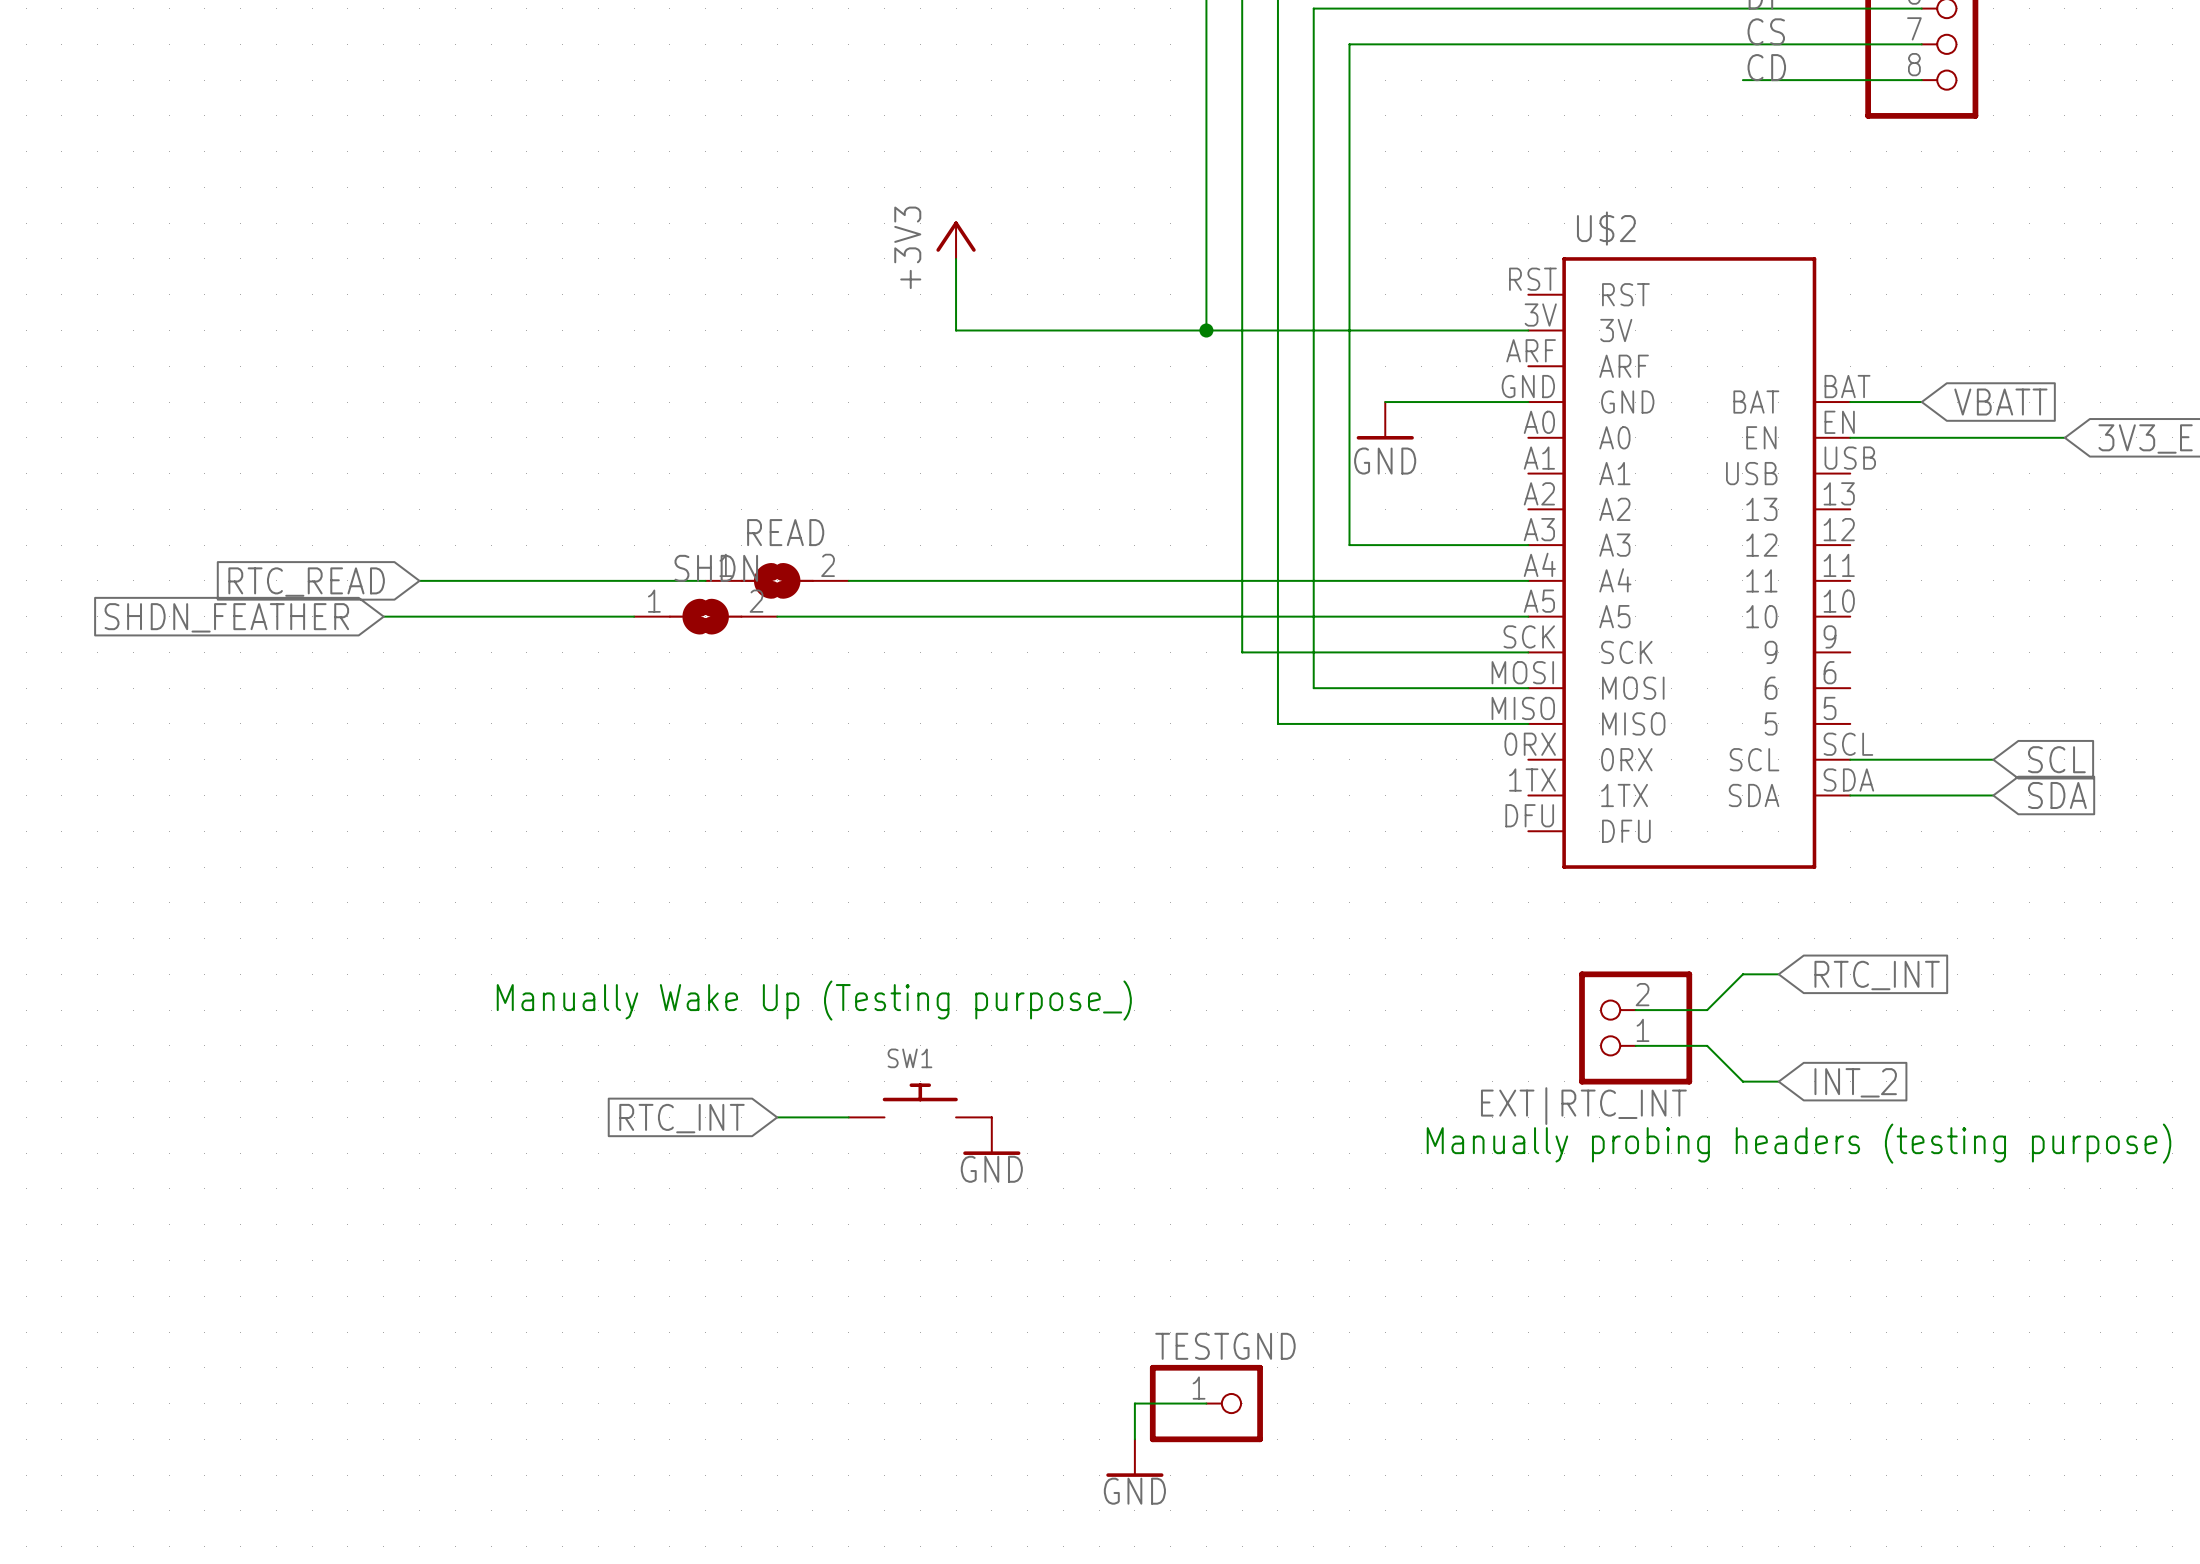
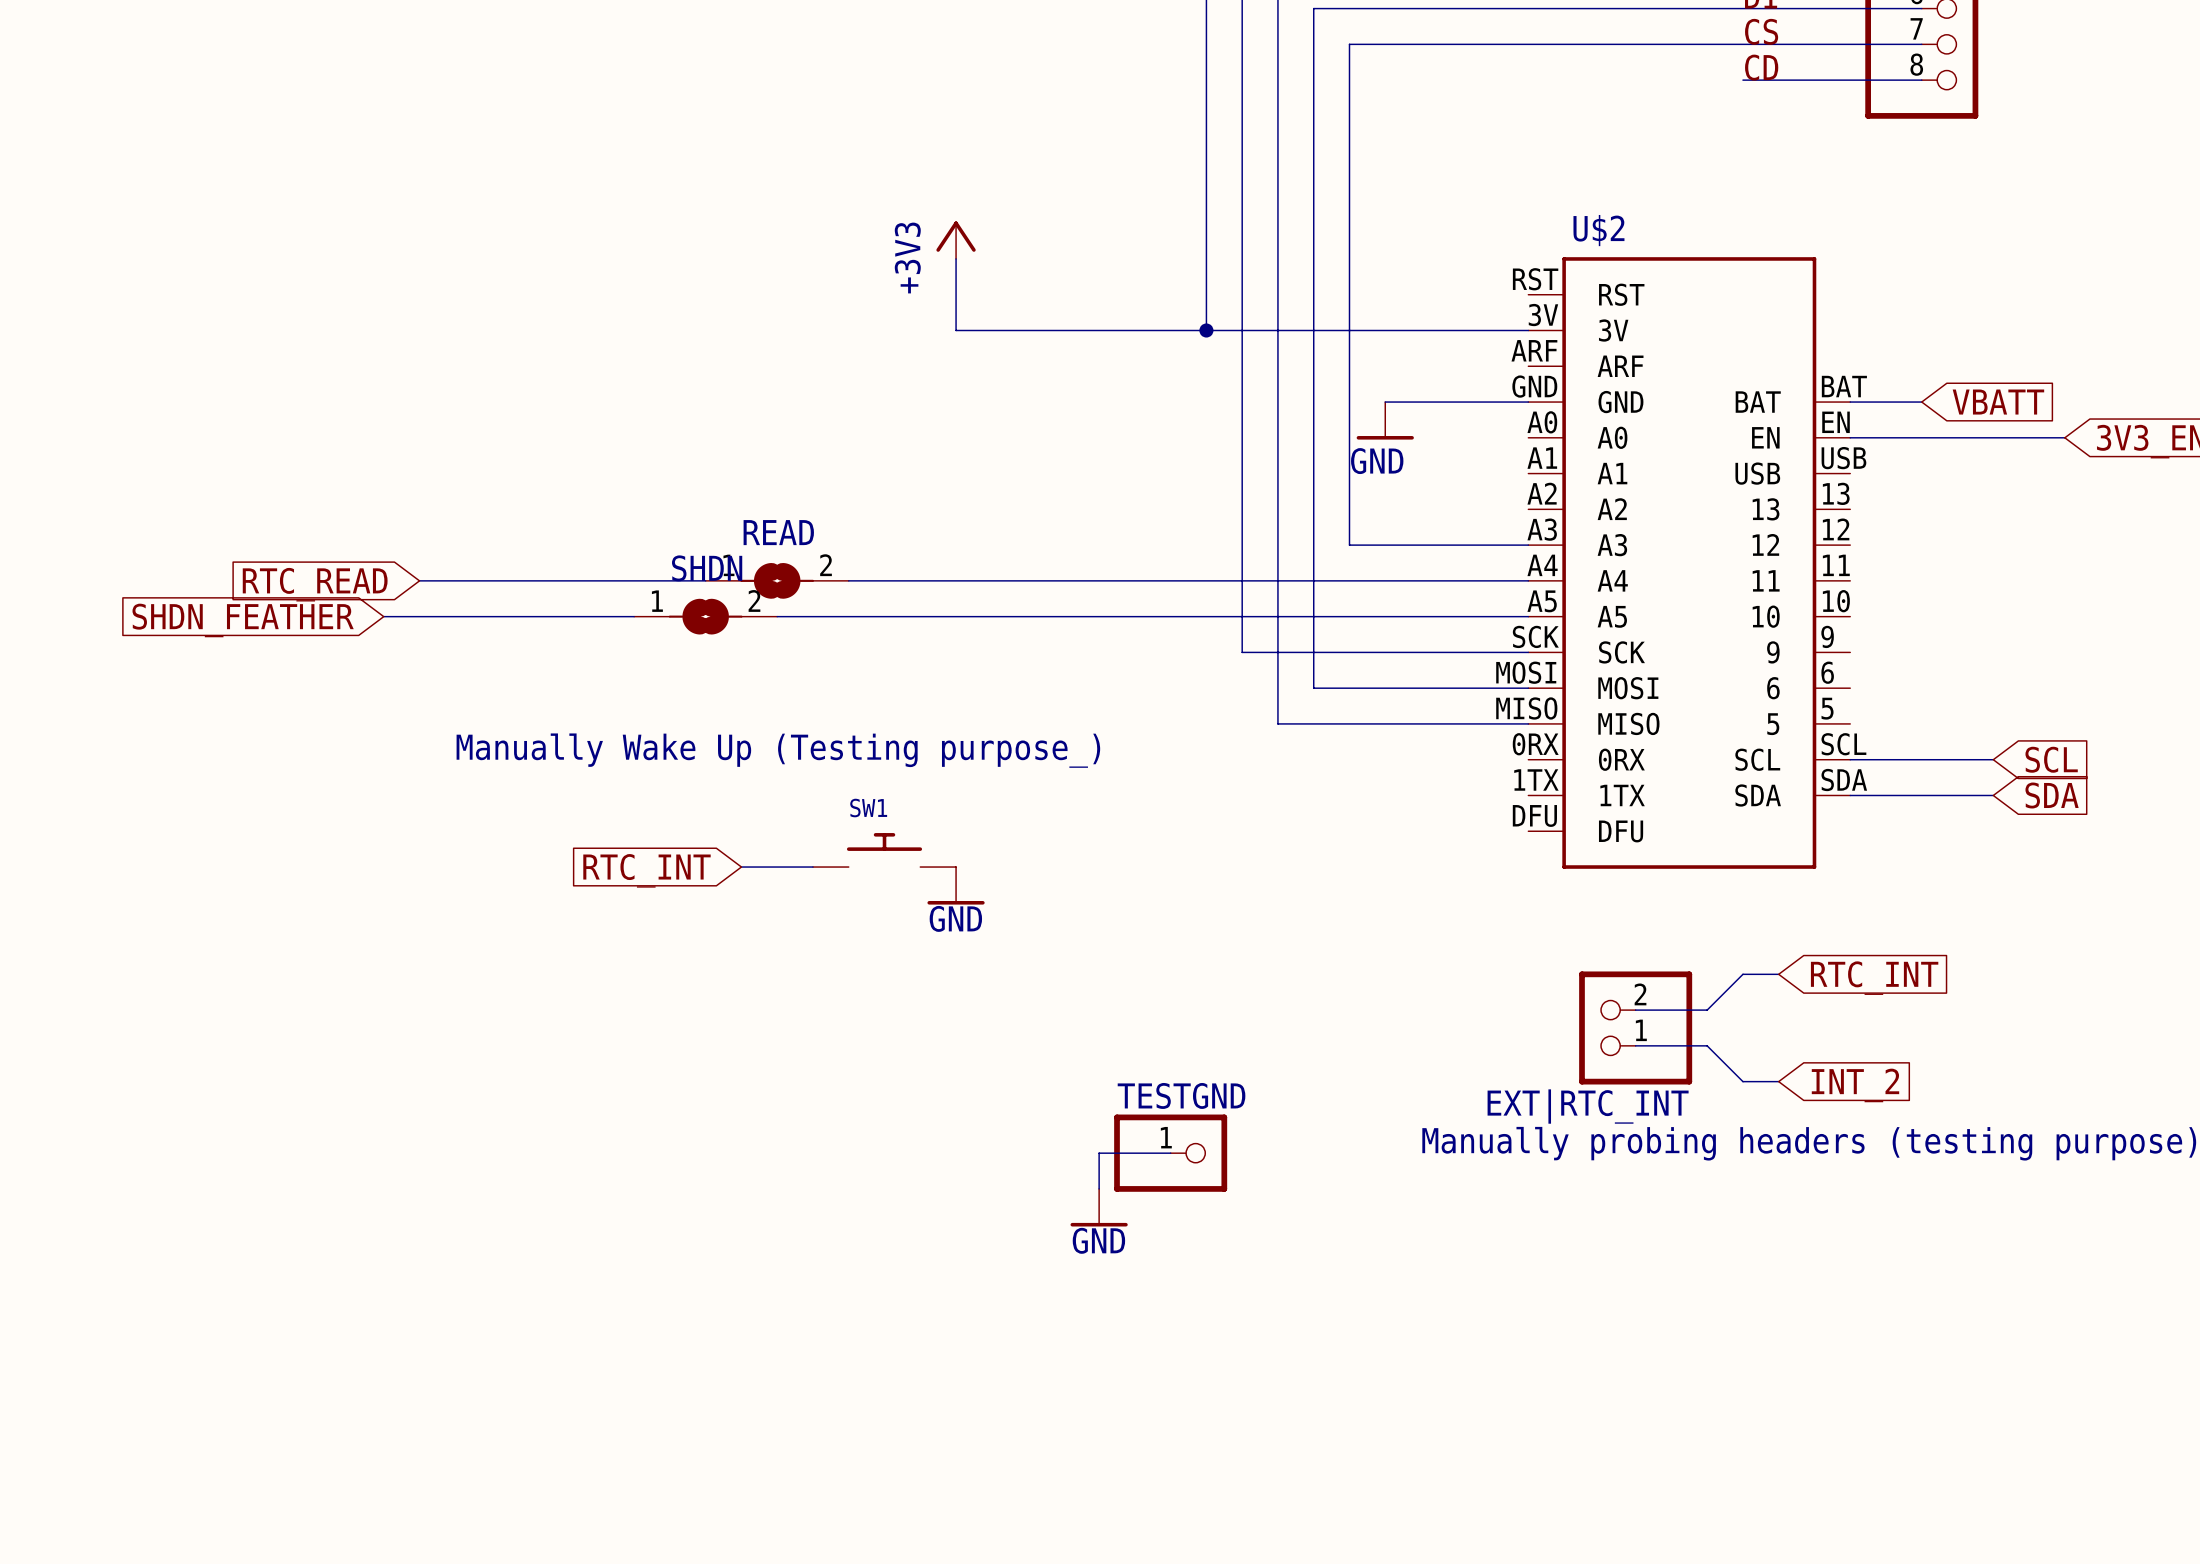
power symbol: none -> GND (956, 885)
text position: Manually Wake Up (Testing purpose_) (814, 1000) -> Manually Wake Up (Testing purpose_) (778, 750)
SW1 position: (920, 1100) -> (884, 850)
wire: (777, 1117) (848, 1117) -> (741, 867) (812, 867)
global label position: RTC_INT (681, 1118) -> RTC_INT (646, 870)
power symbol: GND (991, 1136) -> none
power symbol: none -> GND (1099, 1207)
wire: (1206, 1403) (1134, 1403) (1134, 1439) -> (1170, 1153) (1099, 1153) (1099, 1188)
TESTGND position: (1206, 1403) -> (1170, 1153)
power symbol: GND (1134, 1458) -> none

